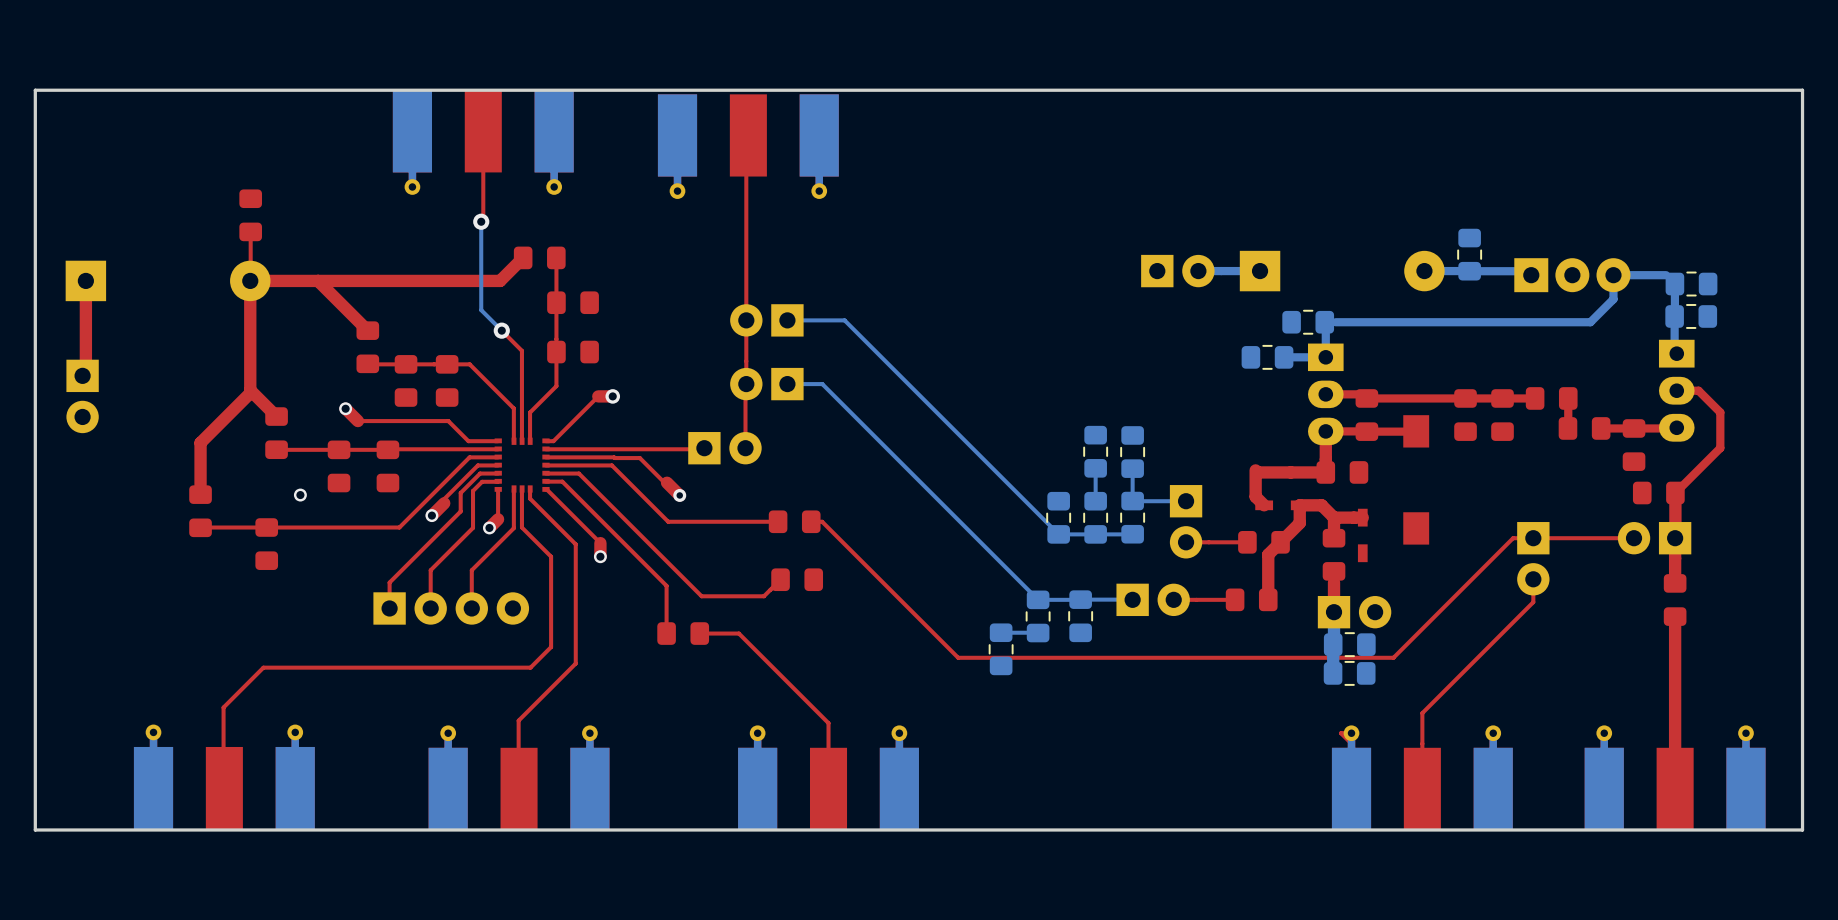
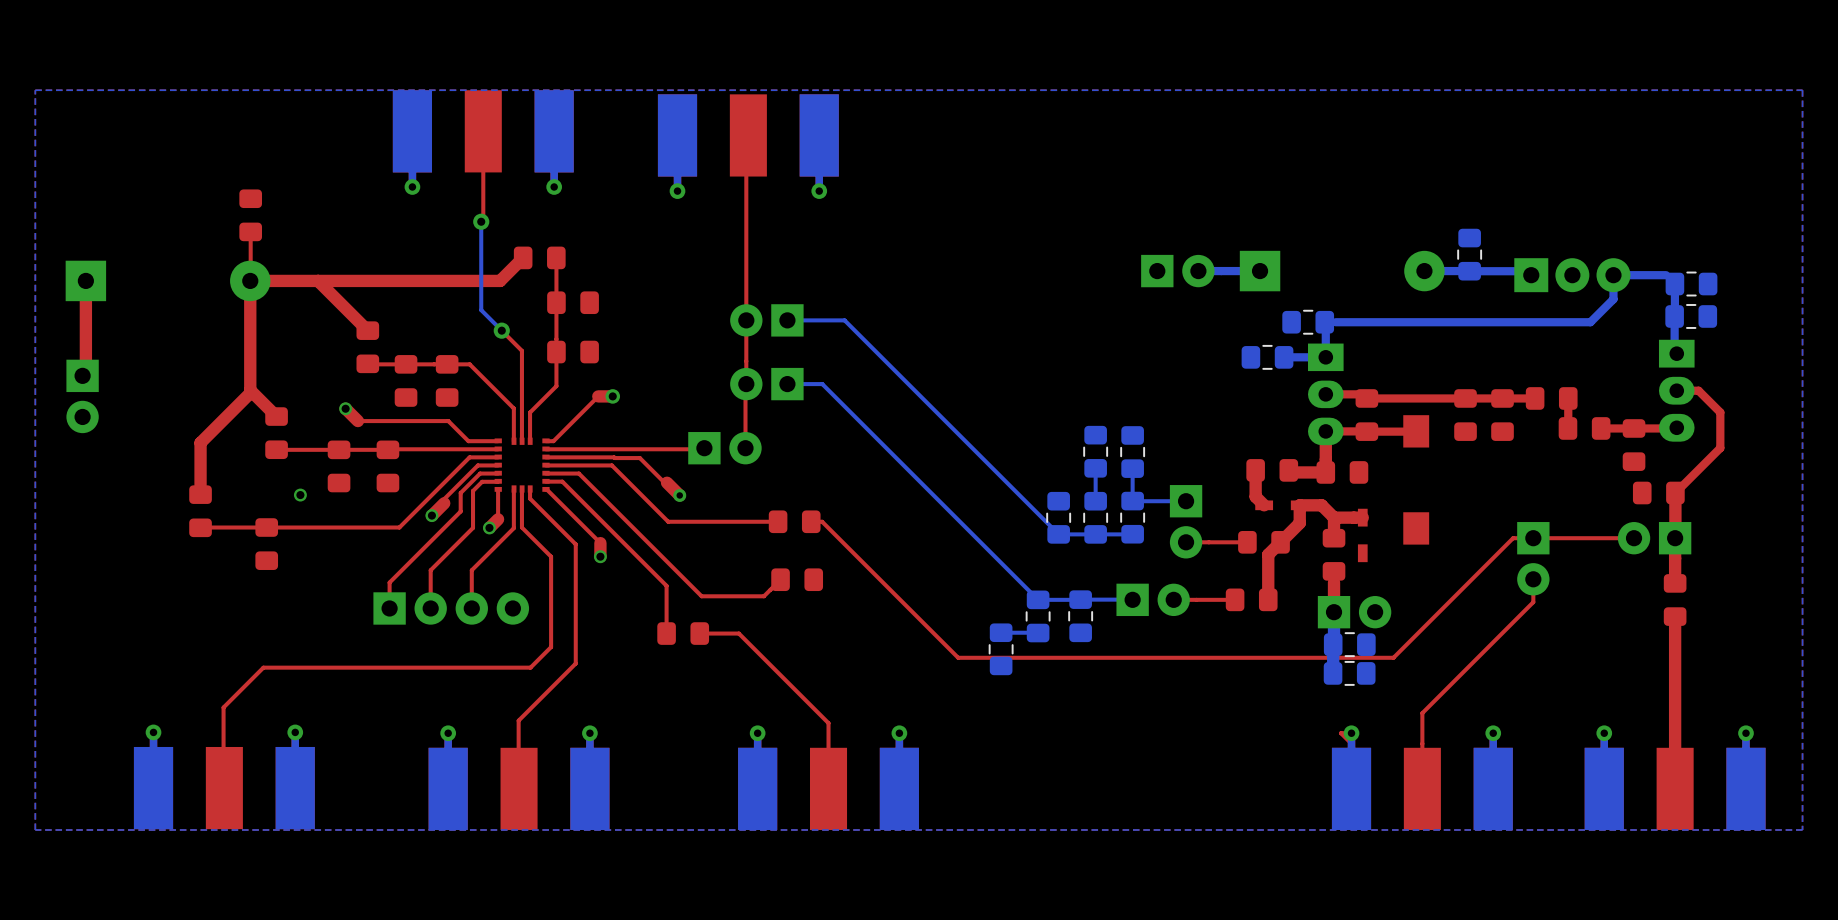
board edge: (1802, 90) (35, 90) (35, 829) (1802, 829) (1802, 90) -> none
top track: (1255, 470) (1257, 472) (1290, 472) -> none
part: none -> (1272, 470)

